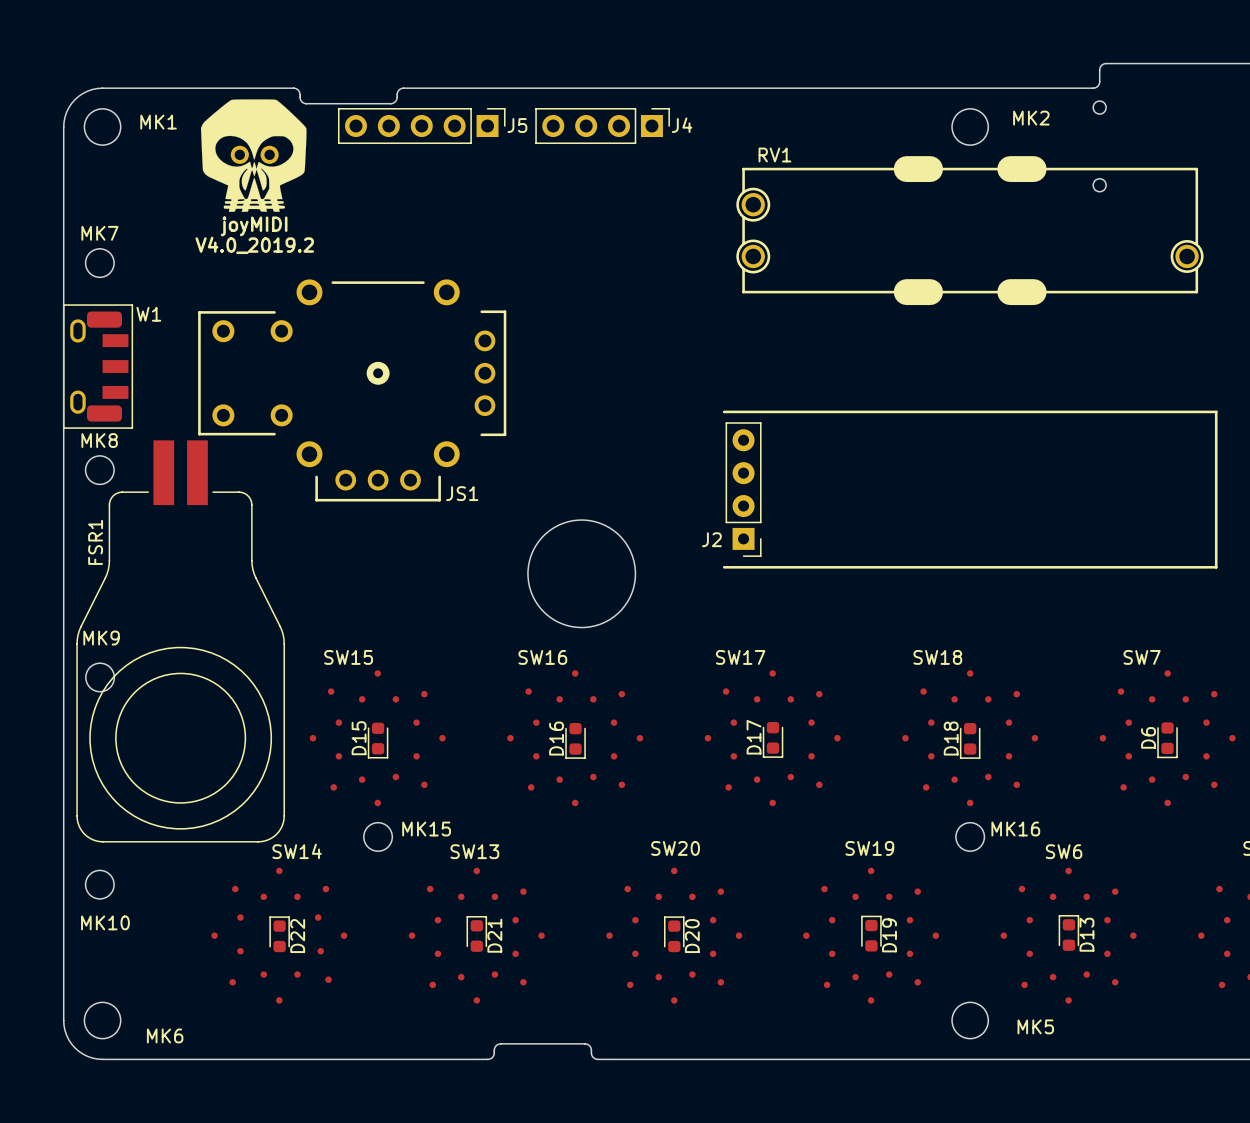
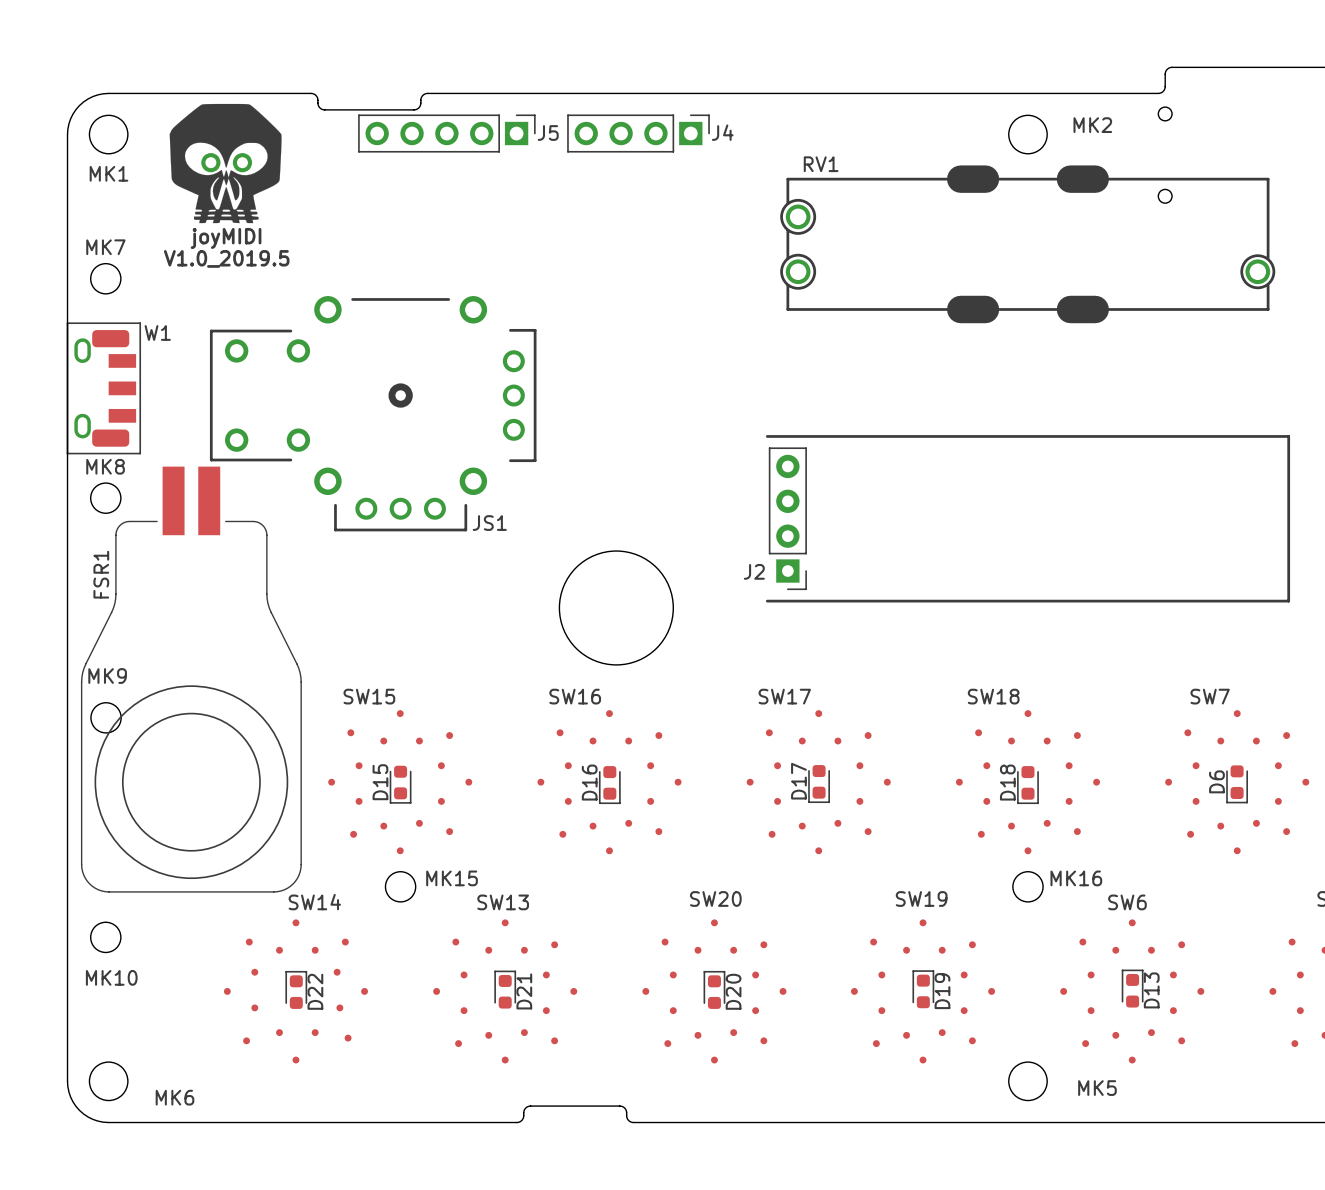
MK1 name position: MK1 (158, 122) -> MK1 (108, 173)
part position: (253, 155) -> (225, 163)
text position: joyMIDI (254, 226) -> joyMIDI (226, 238)
text: V4.0_2019.2 (254, 245) -> V1.0_2019.5 (226, 258)

